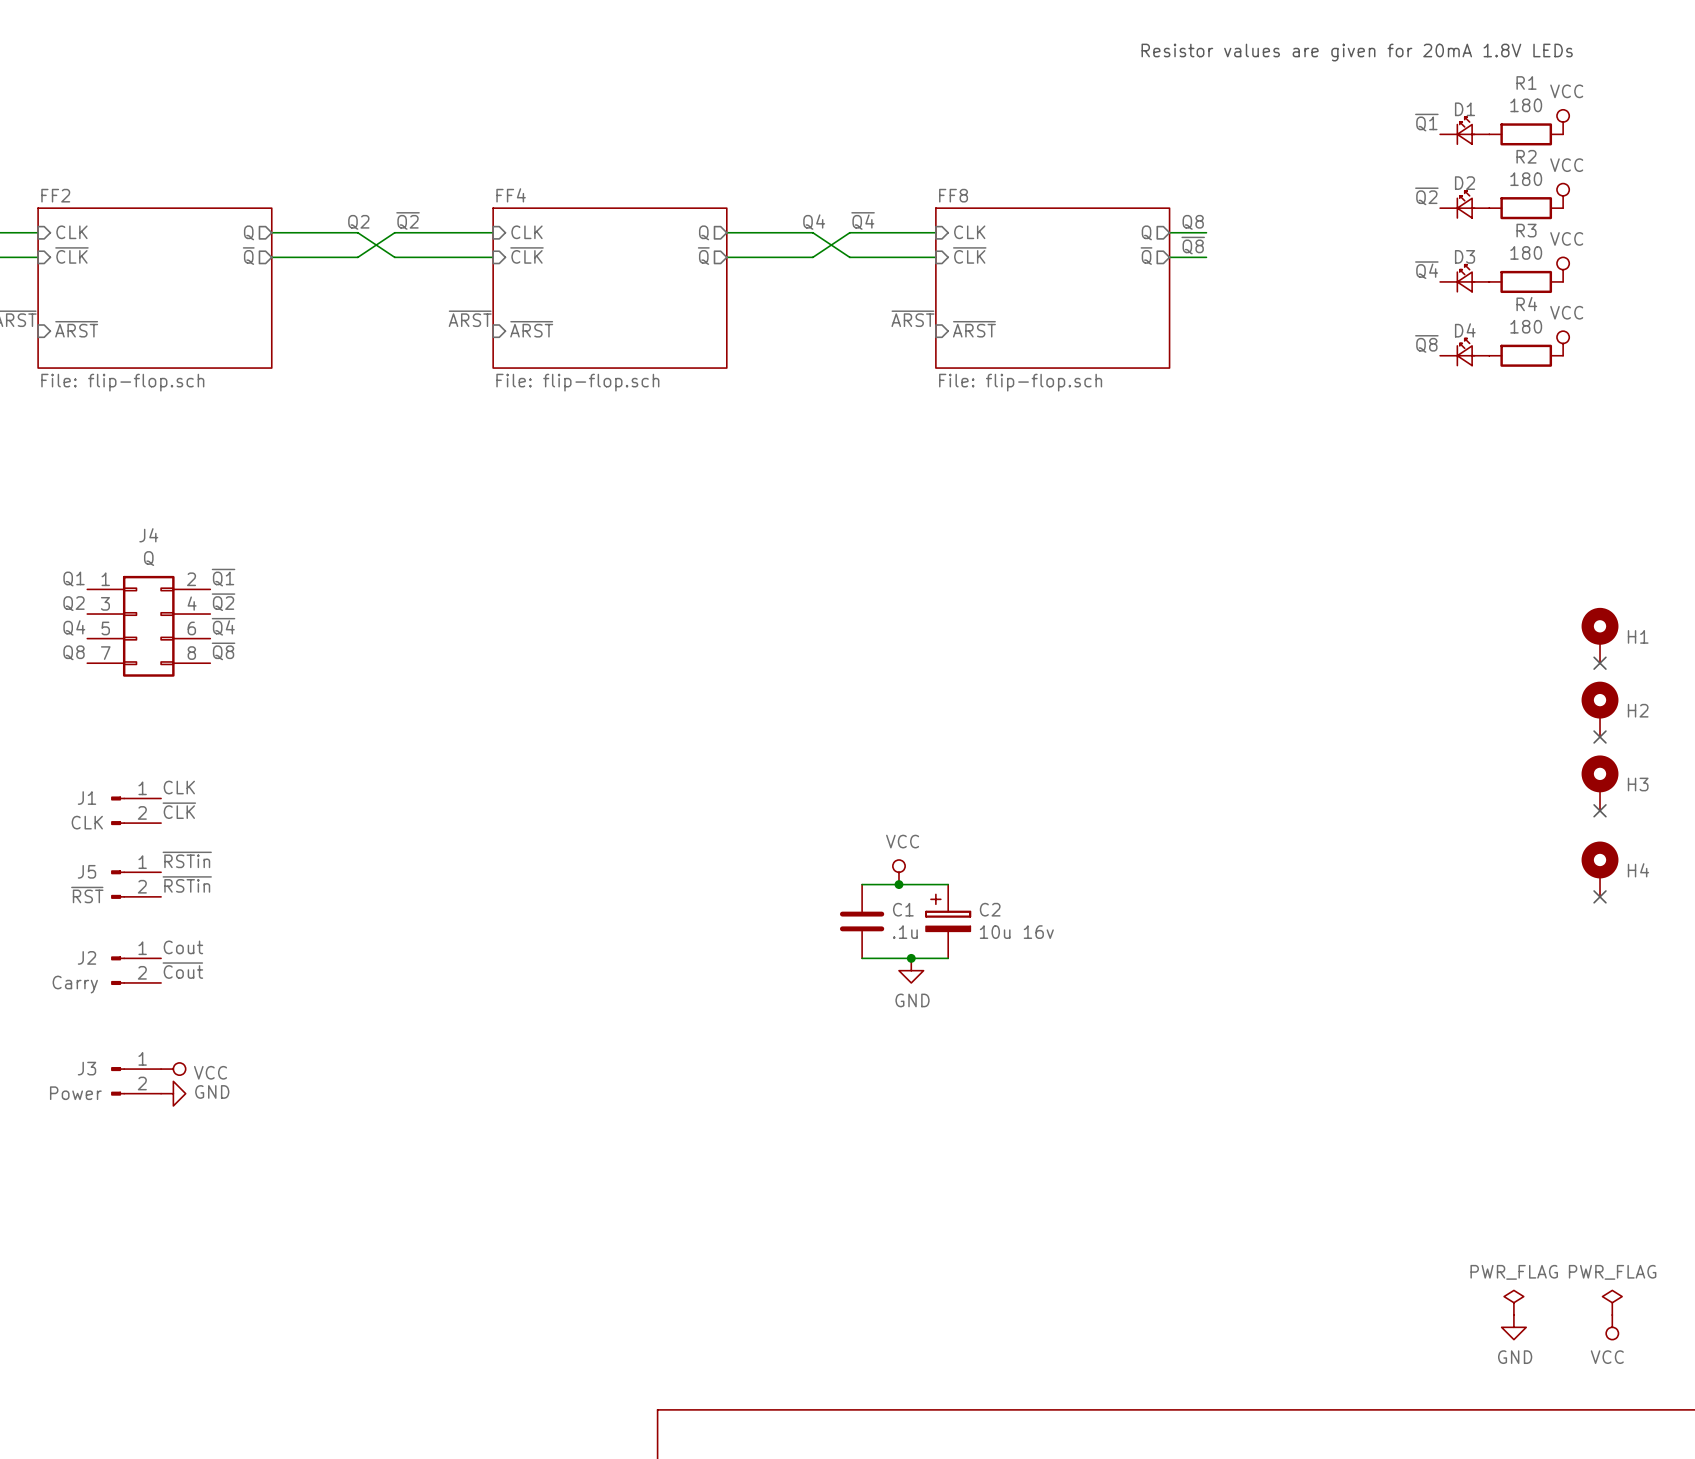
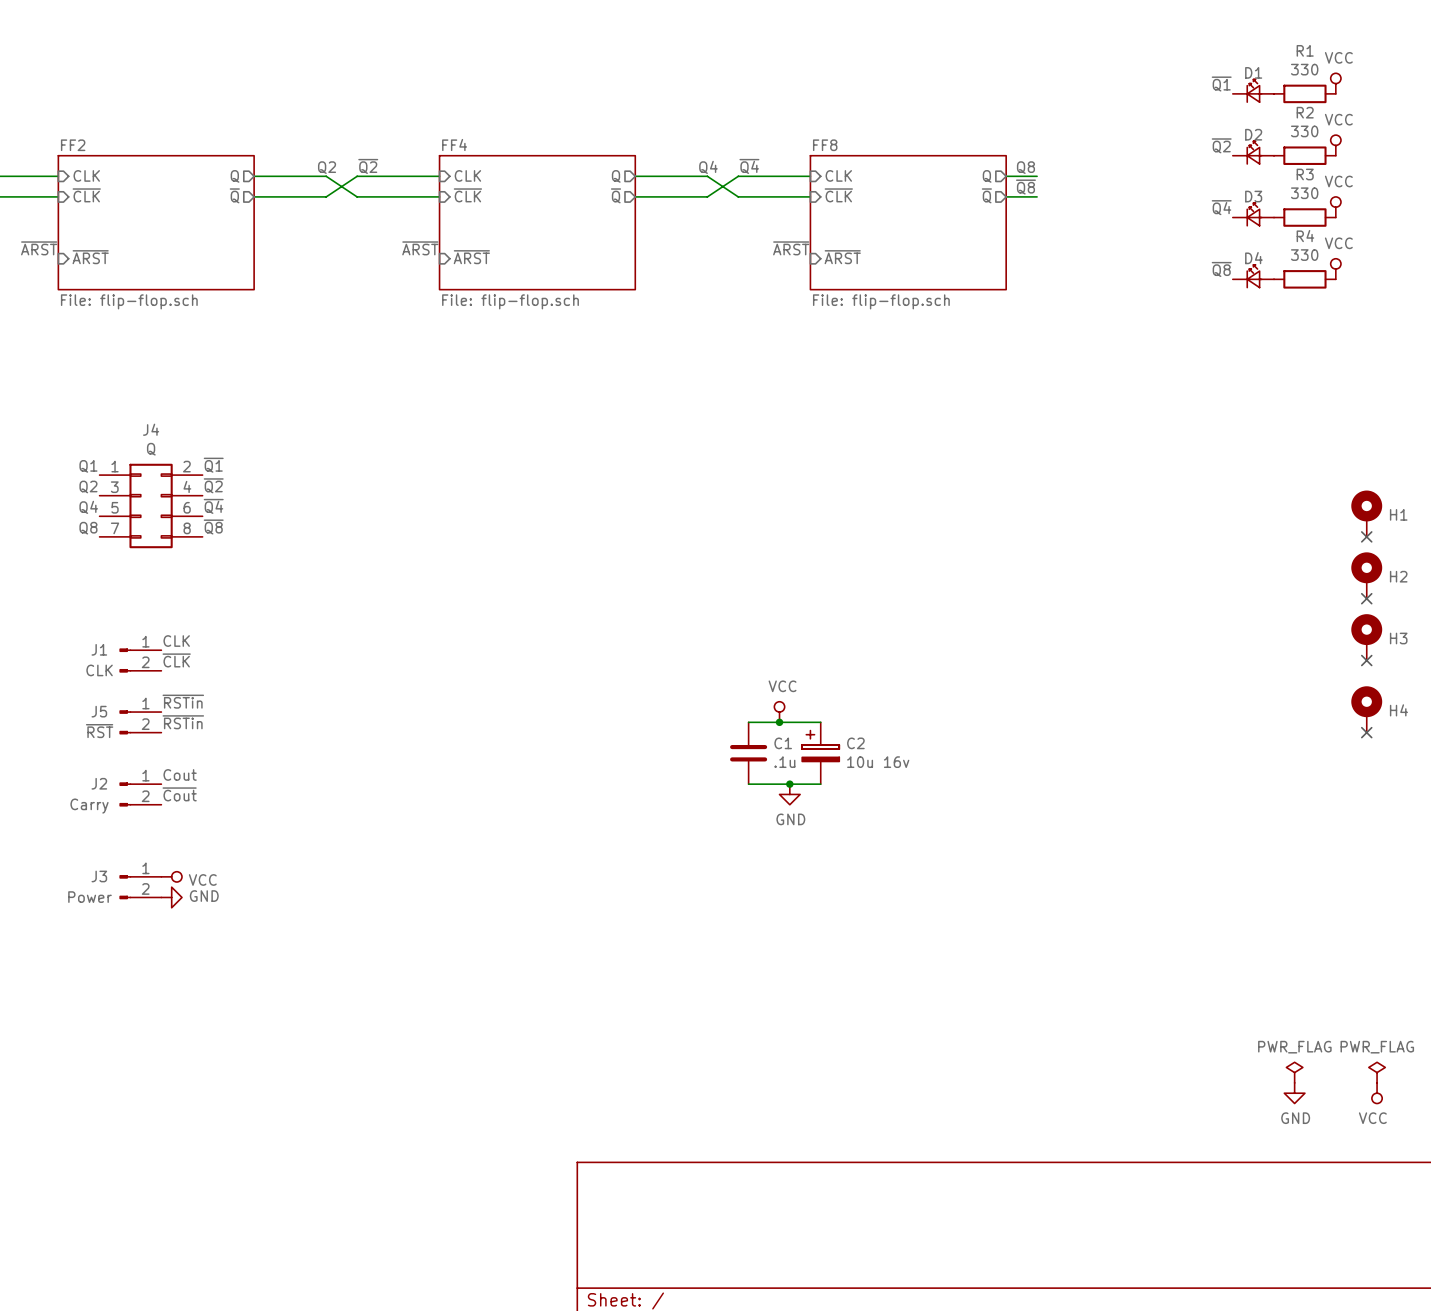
text: Resistor values are given for 20mA 1.8V LEDs (1357, 52) -> none
R1 value: 180 (1526, 105) -> 330 (1304, 69)
R2 value: 180 (1526, 179) -> 330 (1304, 131)
R3 value: 180 (1526, 252) -> 330 (1304, 193)
R4 value: 180 (1526, 326) -> 330 (1304, 255)

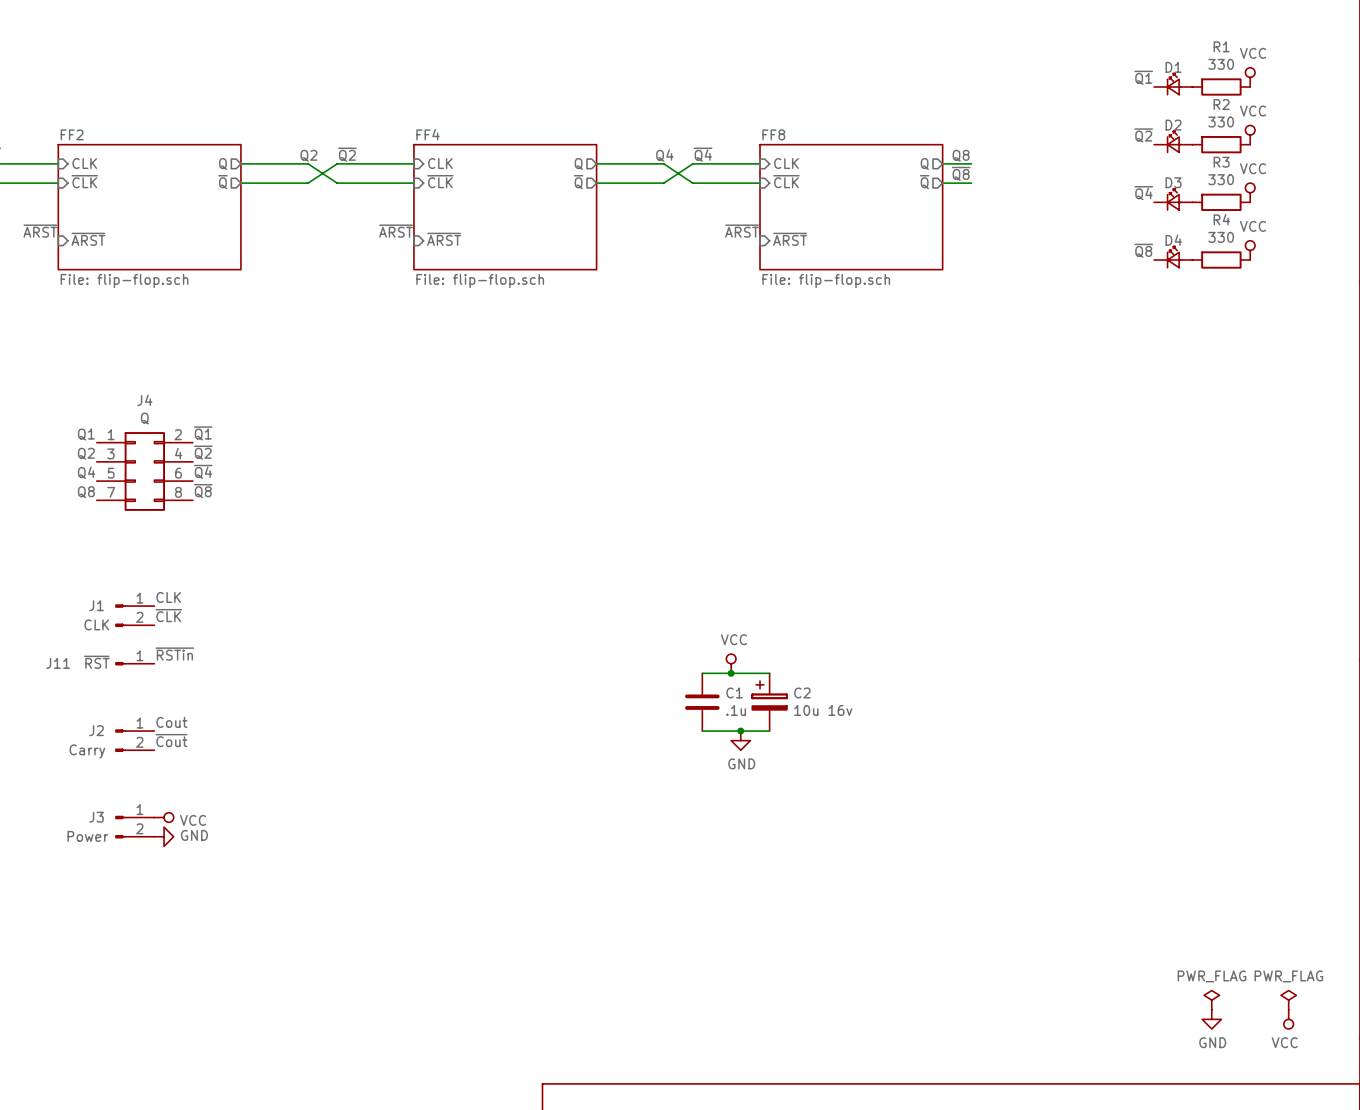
H1: (1366, 513) -> none
no-connect mark: (1366, 536) -> none
H2: (1366, 575) -> none
no-connect mark: (1366, 598) -> none
H3: (1366, 637) -> none
no-connect mark: (1366, 660) -> none
H4: (1366, 709) -> none
J11: none -> ~{RST} (134, 663)
J5: ~{RST} (140, 722) -> none
label: ~{RSTin} (183, 722) -> none
no-connect mark: (1366, 732) -> none

